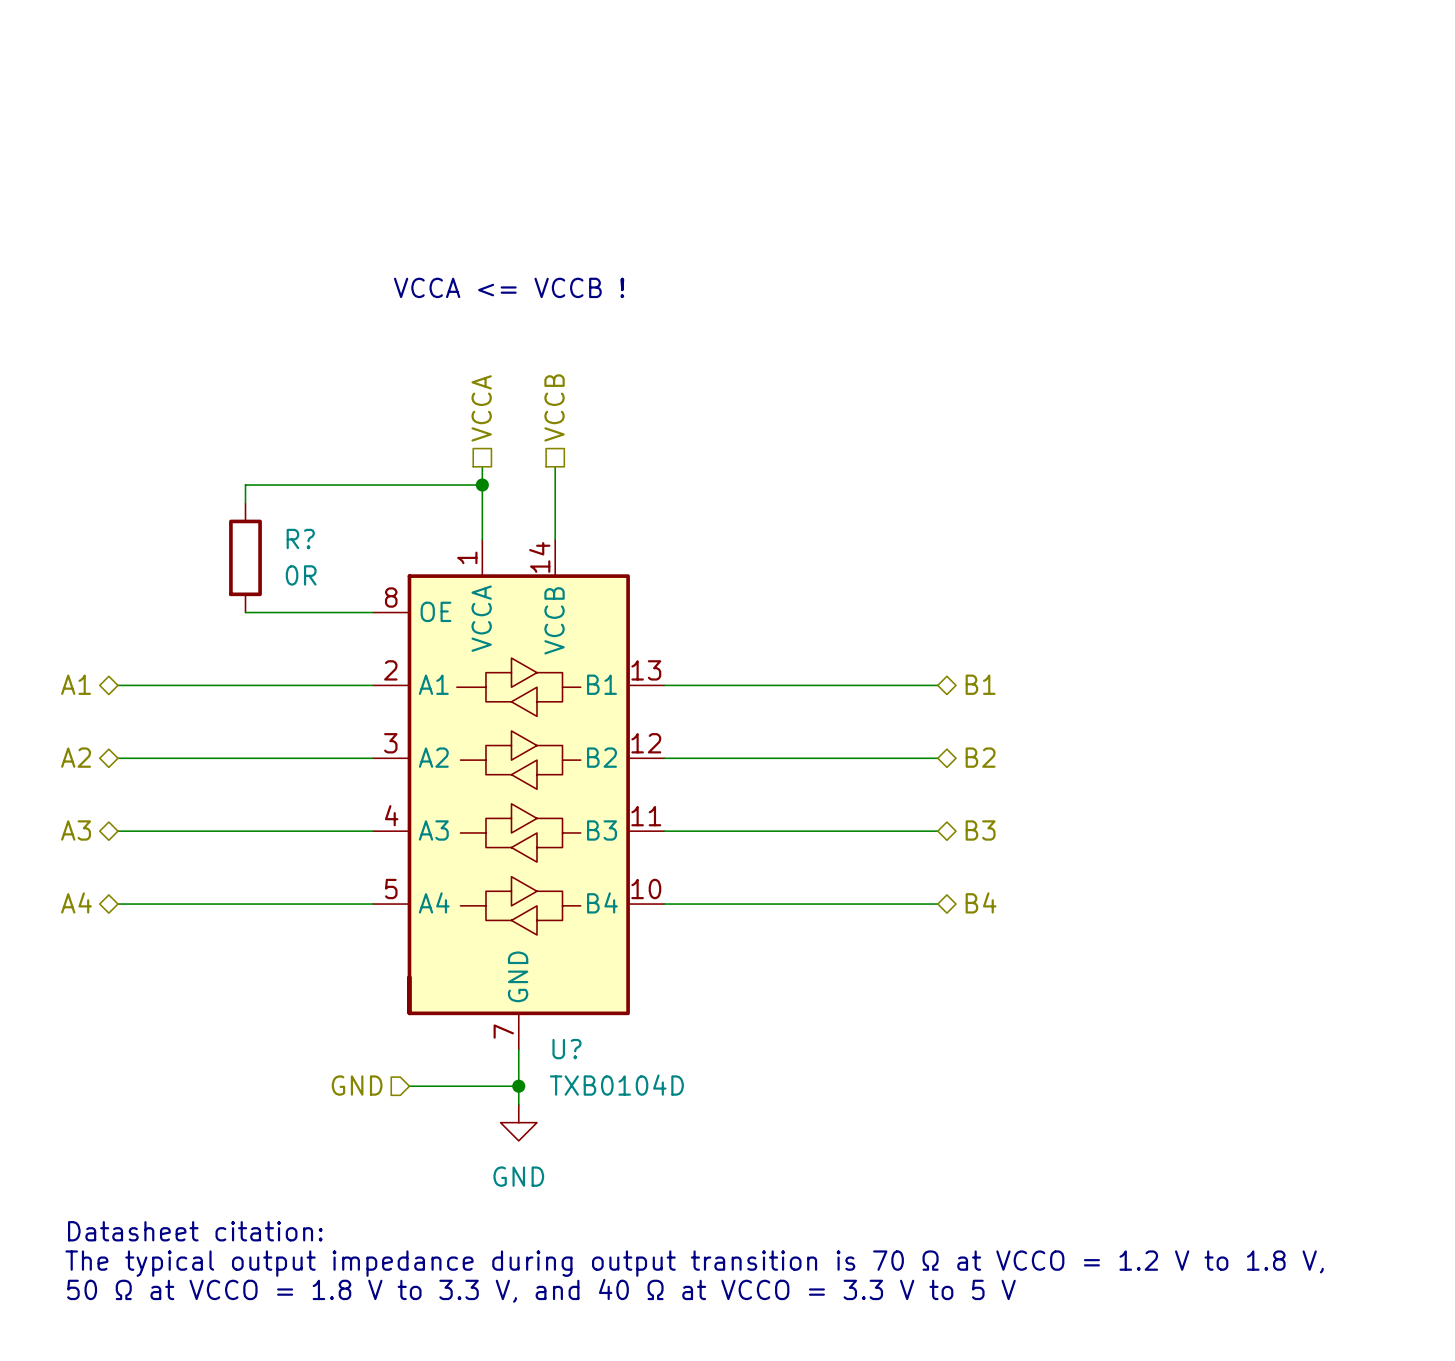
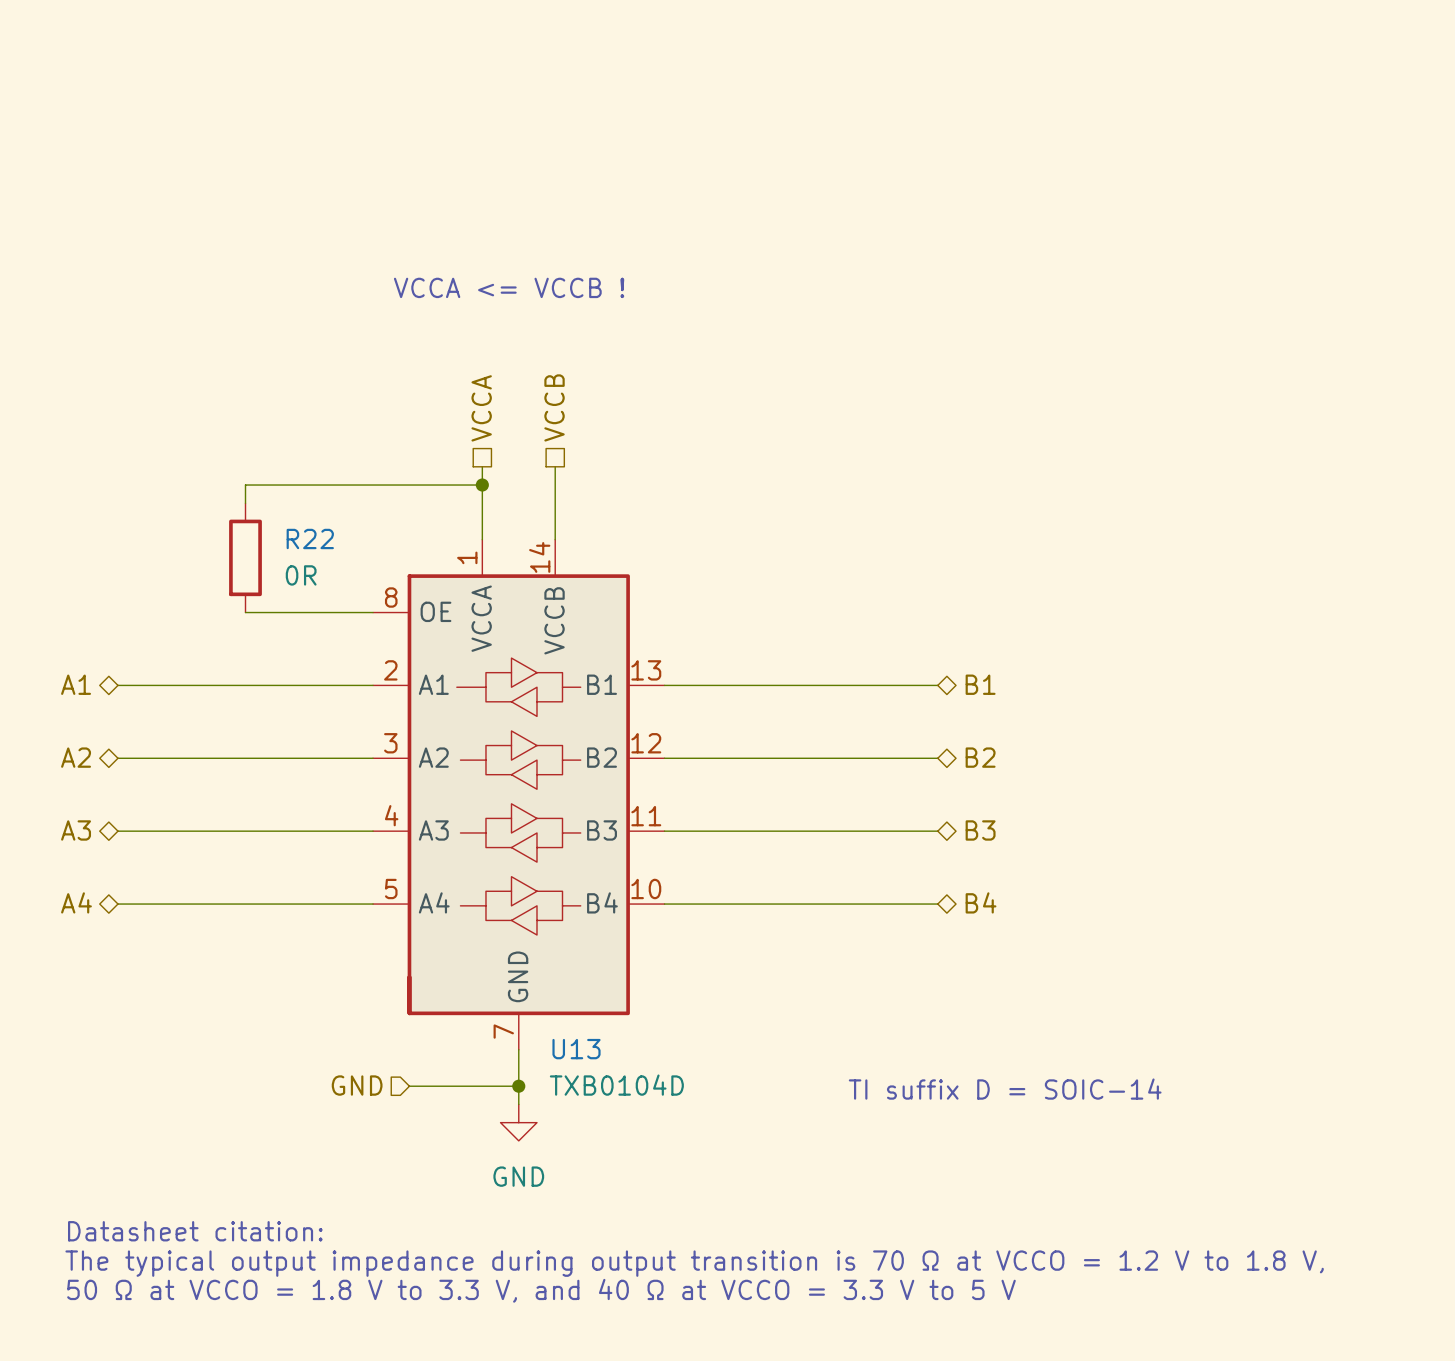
R? name: R? (300, 538) -> R22 (310, 538)
U? name: U? (566, 1049) -> U13 (576, 1049)
text: none -> TI suffix D = SOIC-14 (1005, 1089)

